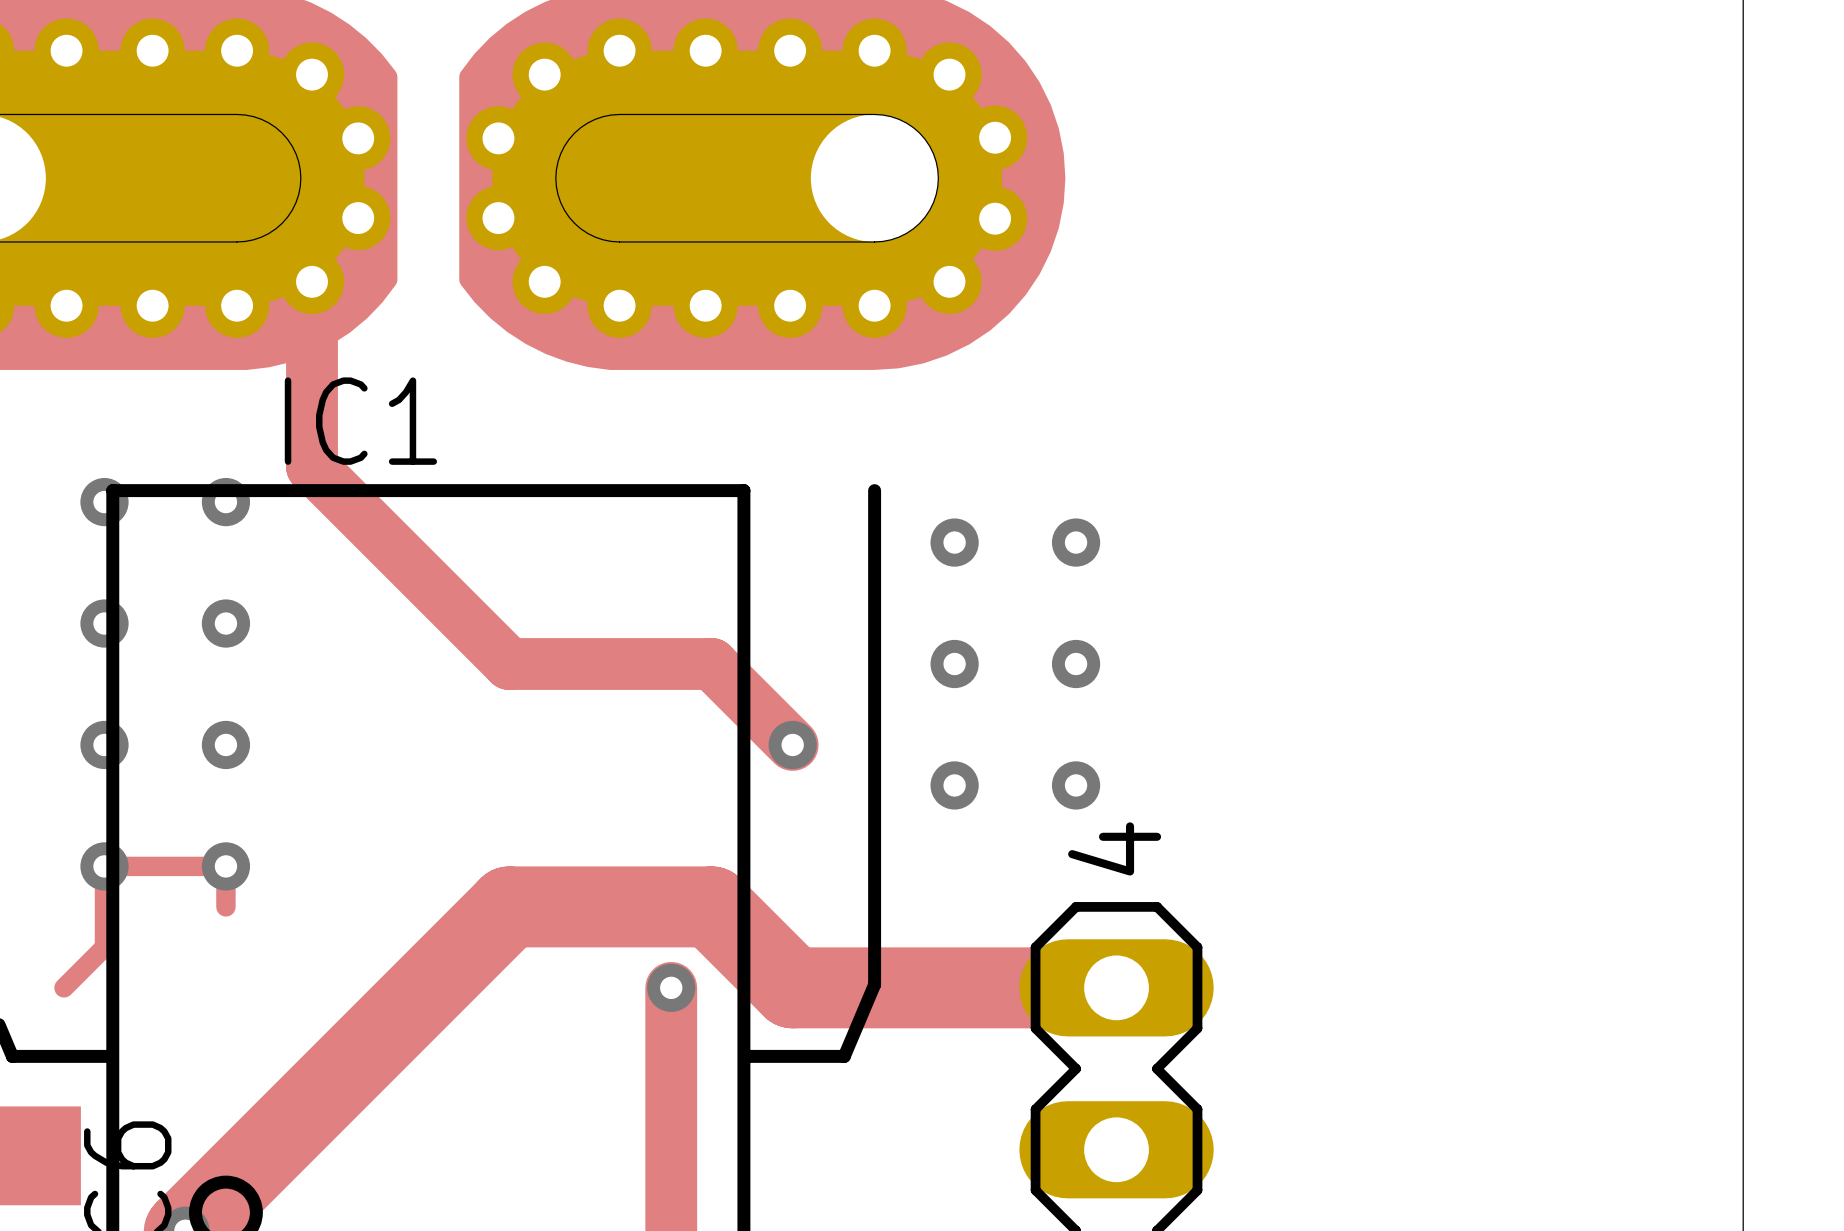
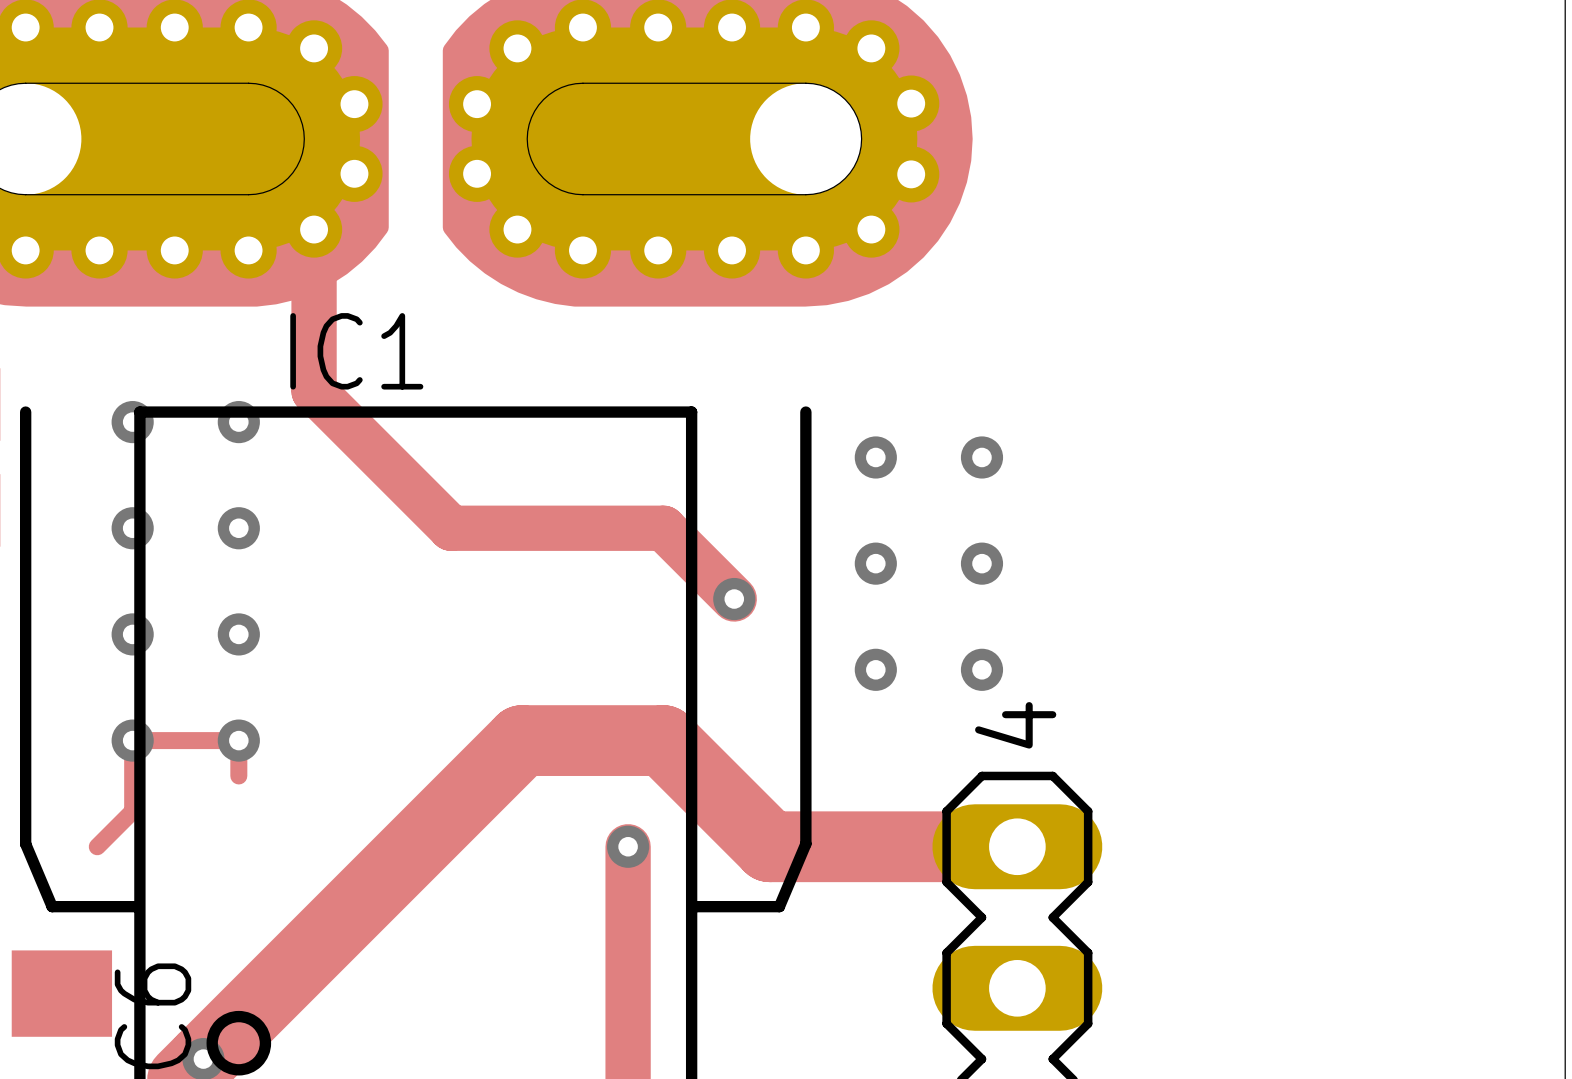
track: (468, 623) (509, 664) (711, 664) (792, 744) -> (451, 528) (663, 528) (734, 599)
via position: (792, 744) -> (734, 599)
track: (509, 906) (711, 906) (792, 987) (833, 987) -> (486, 775) (521, 740) (663, 740) (769, 846)

